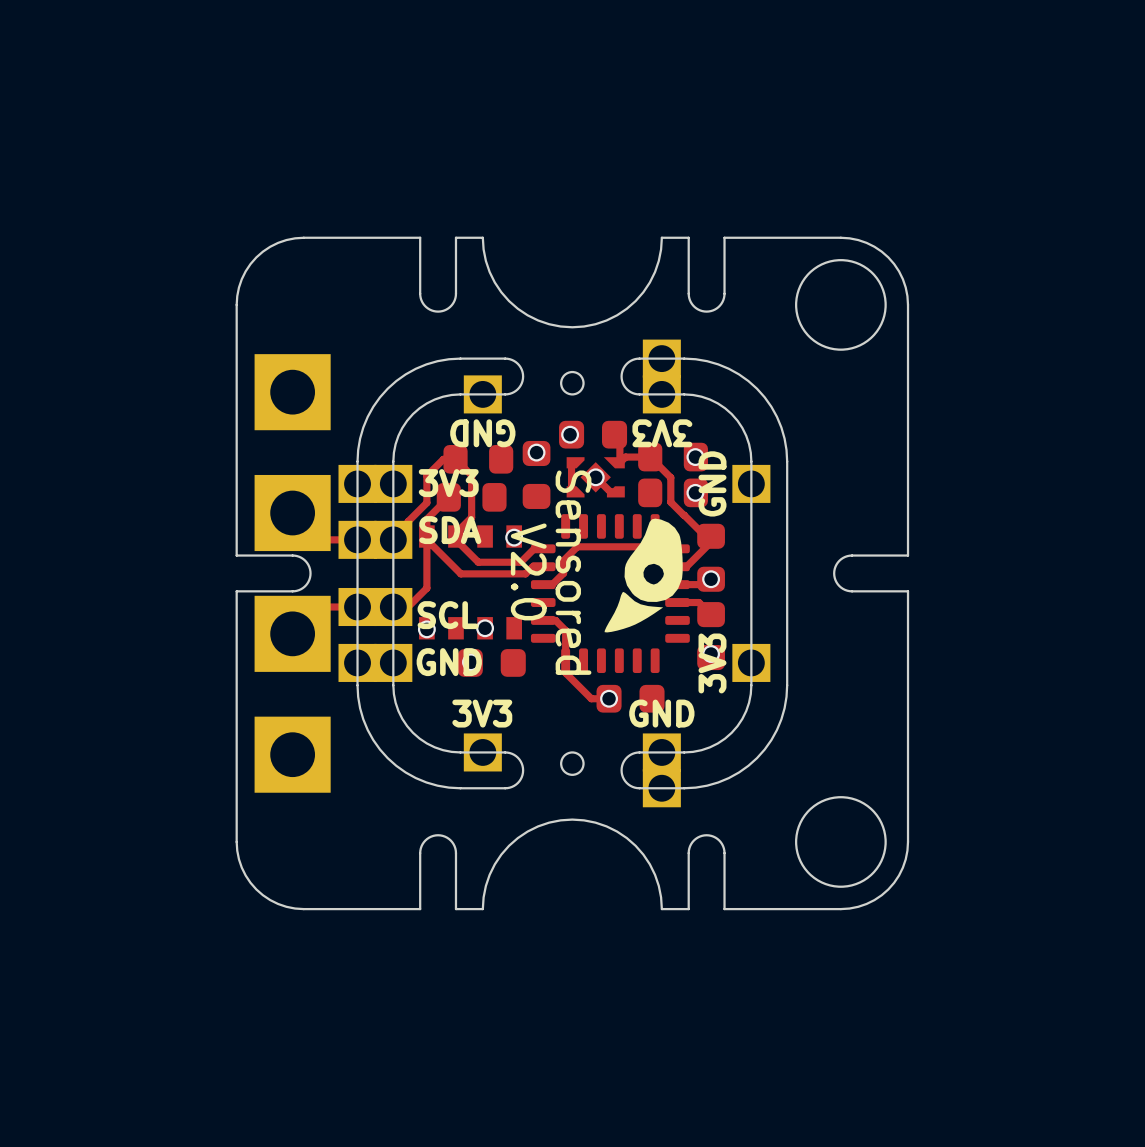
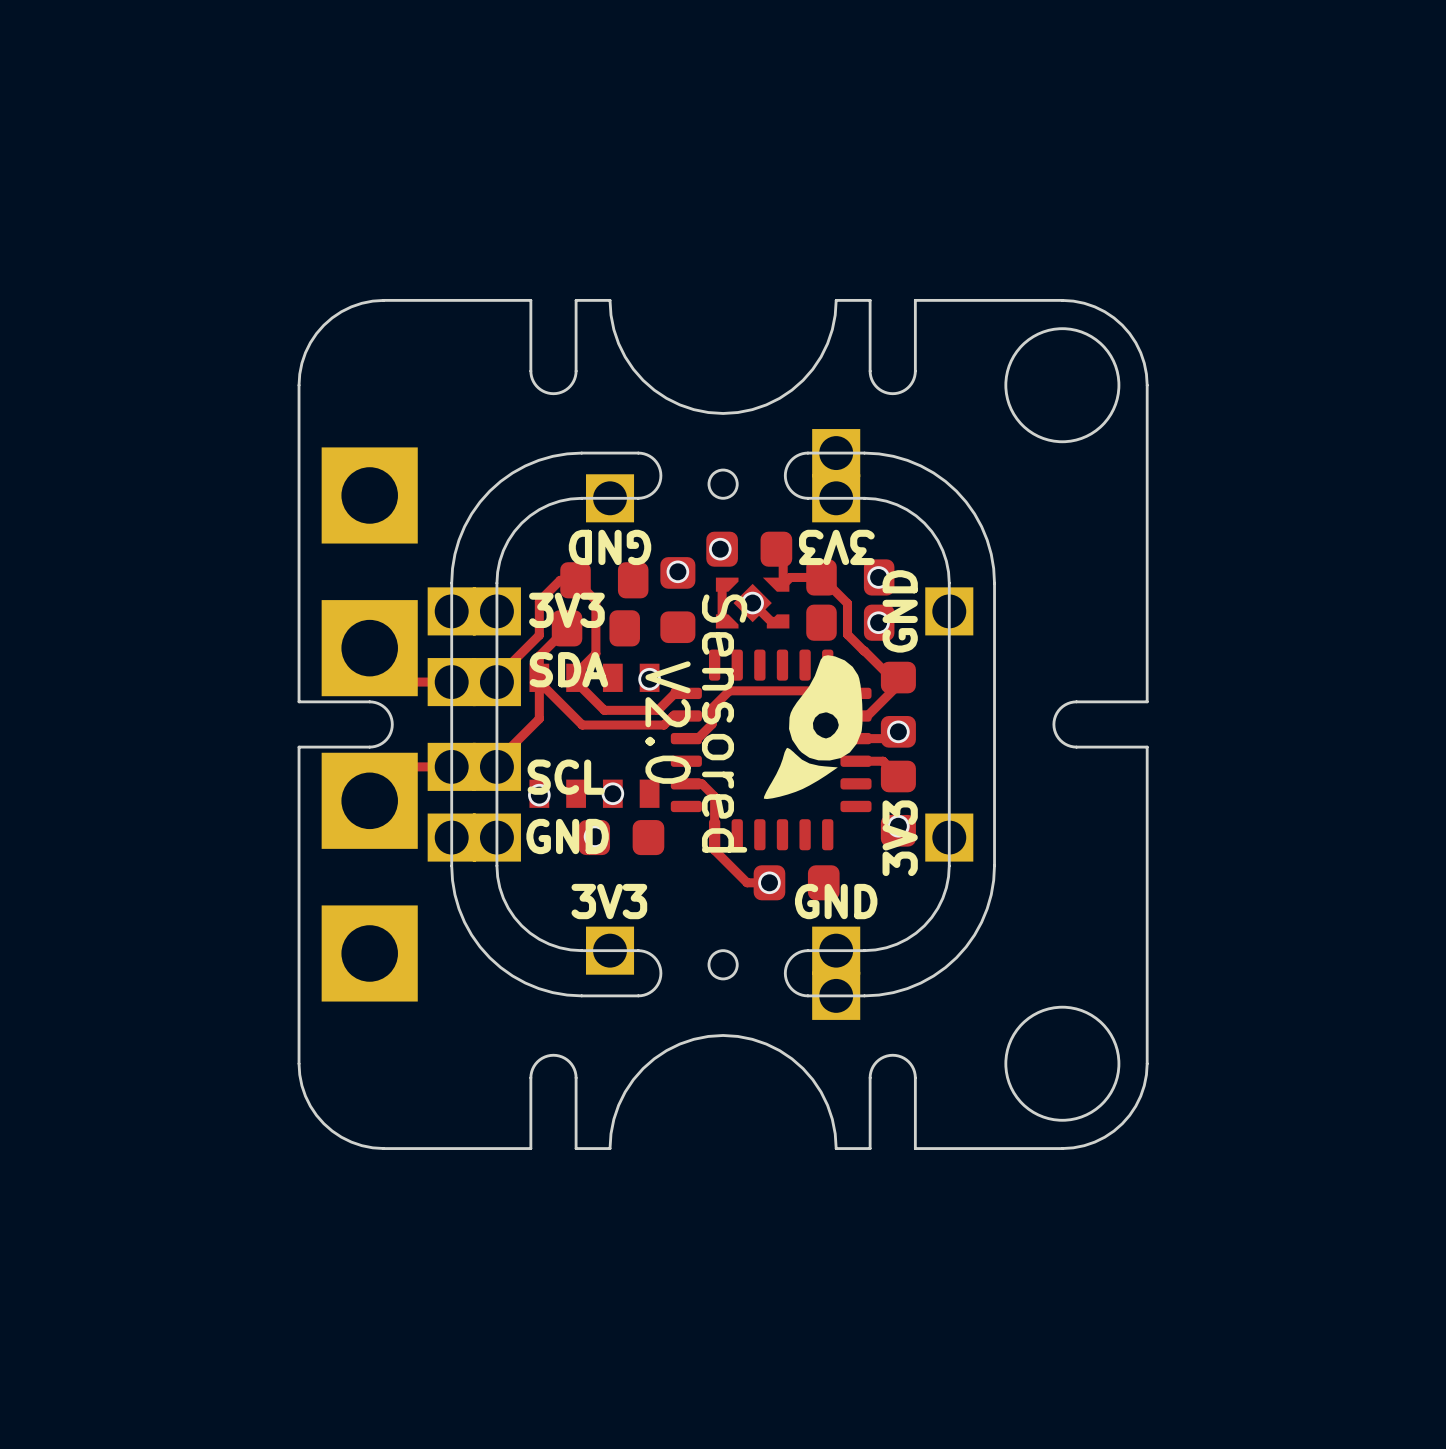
top track: (426, 568) (426, 588) (408, 607) -> (539, 718) (509, 748)

